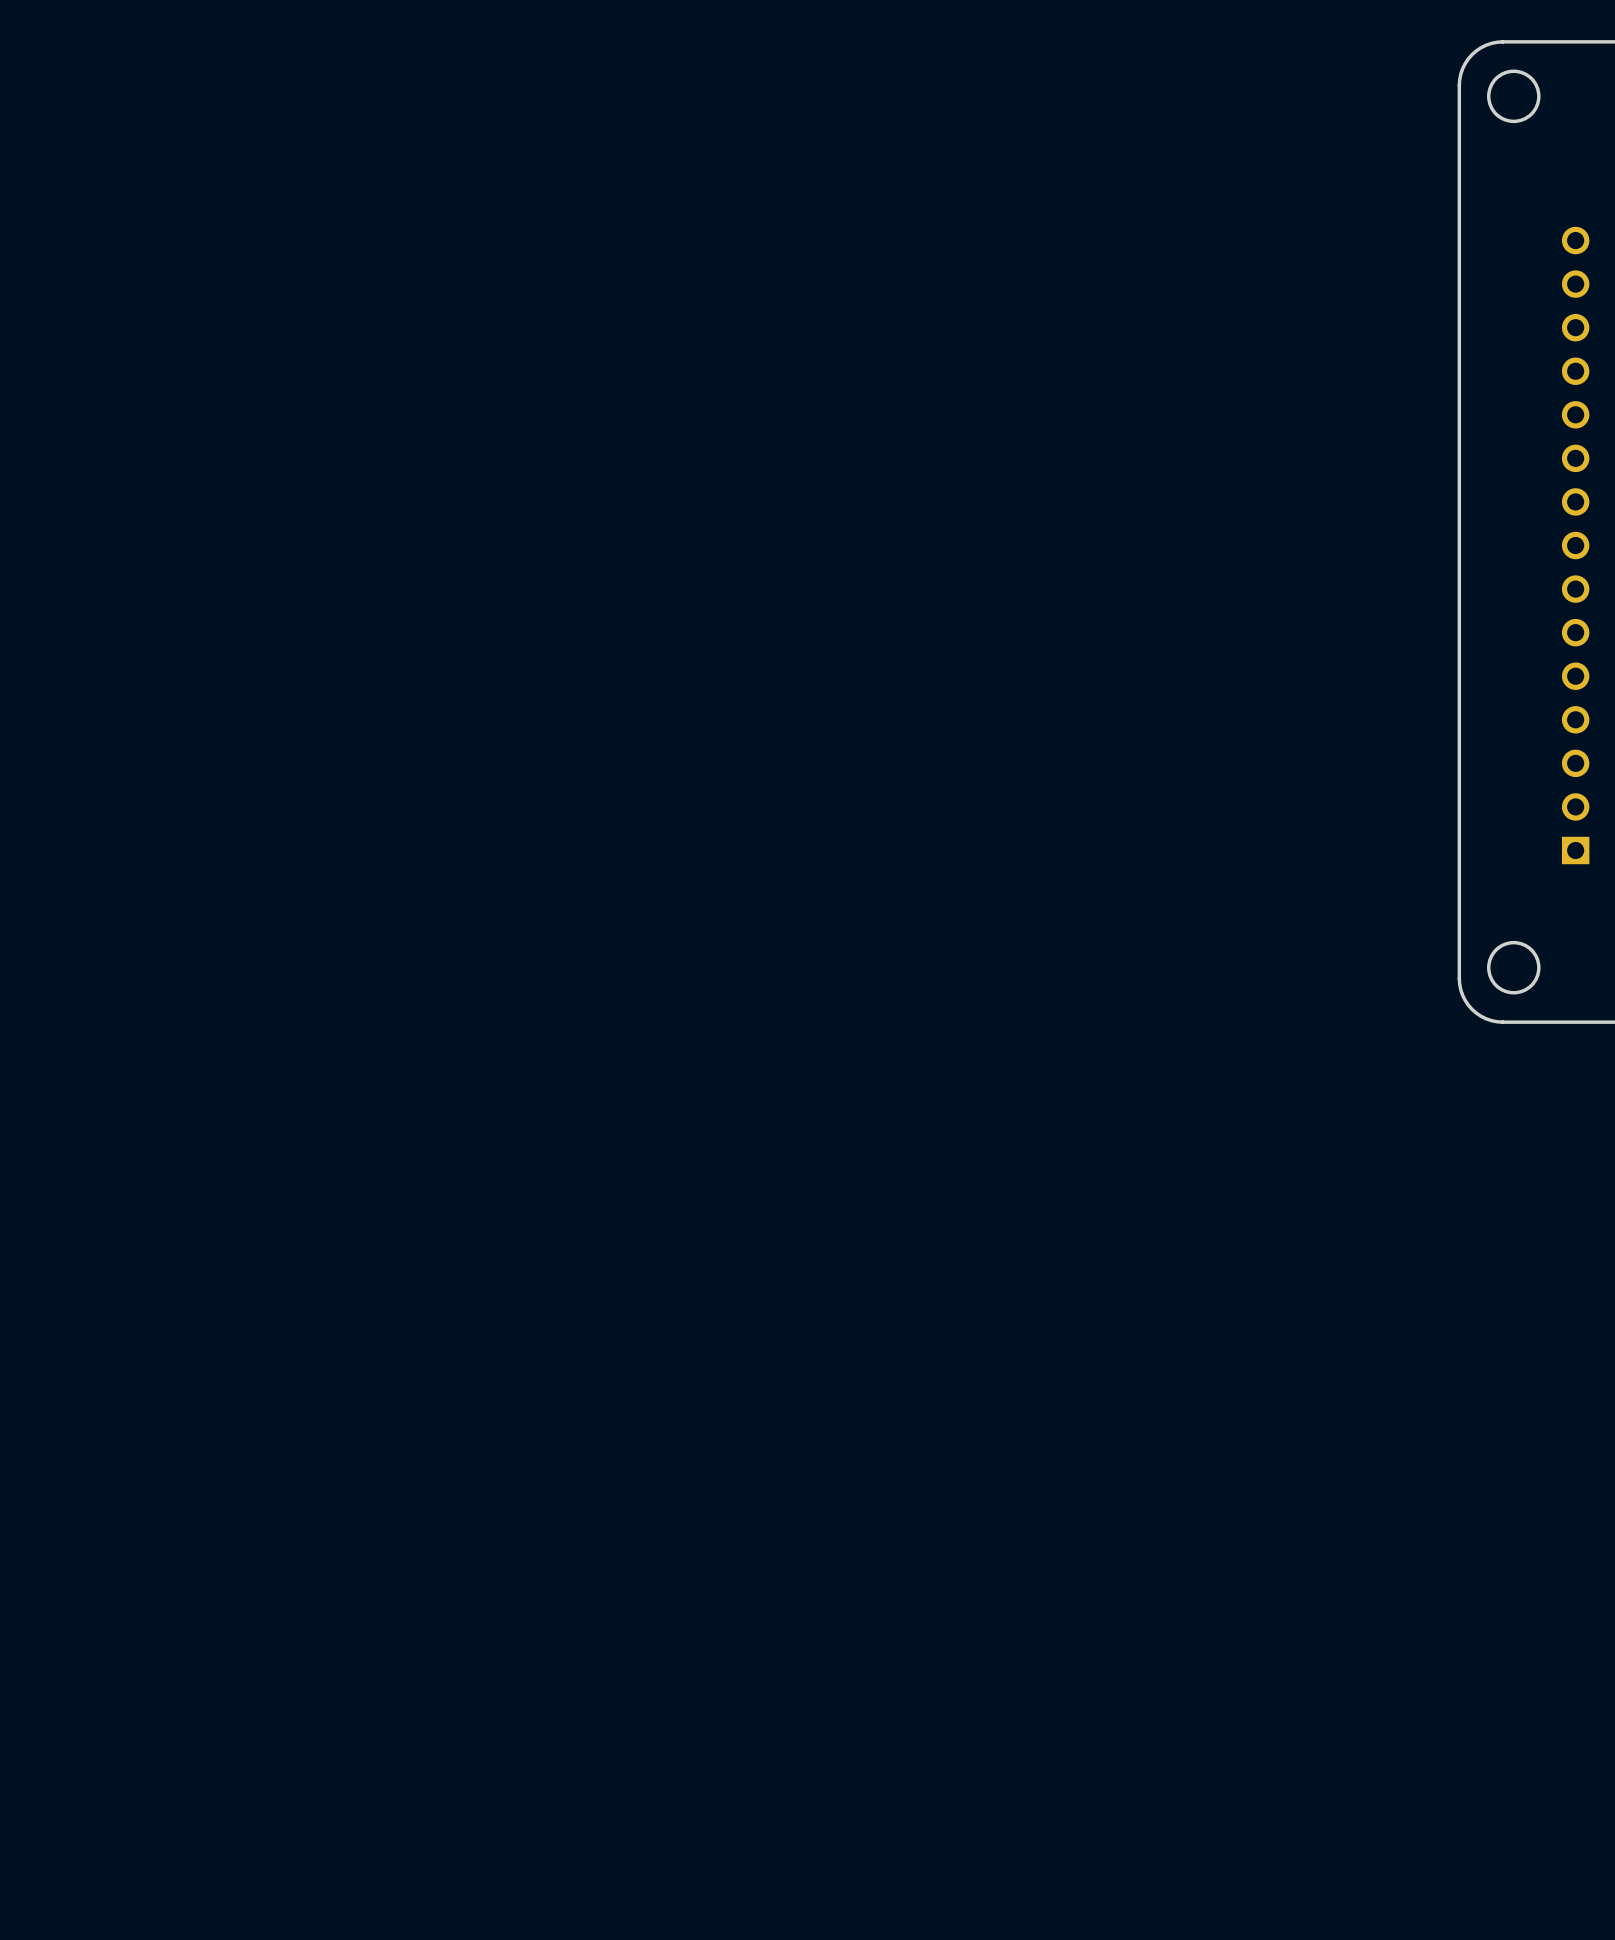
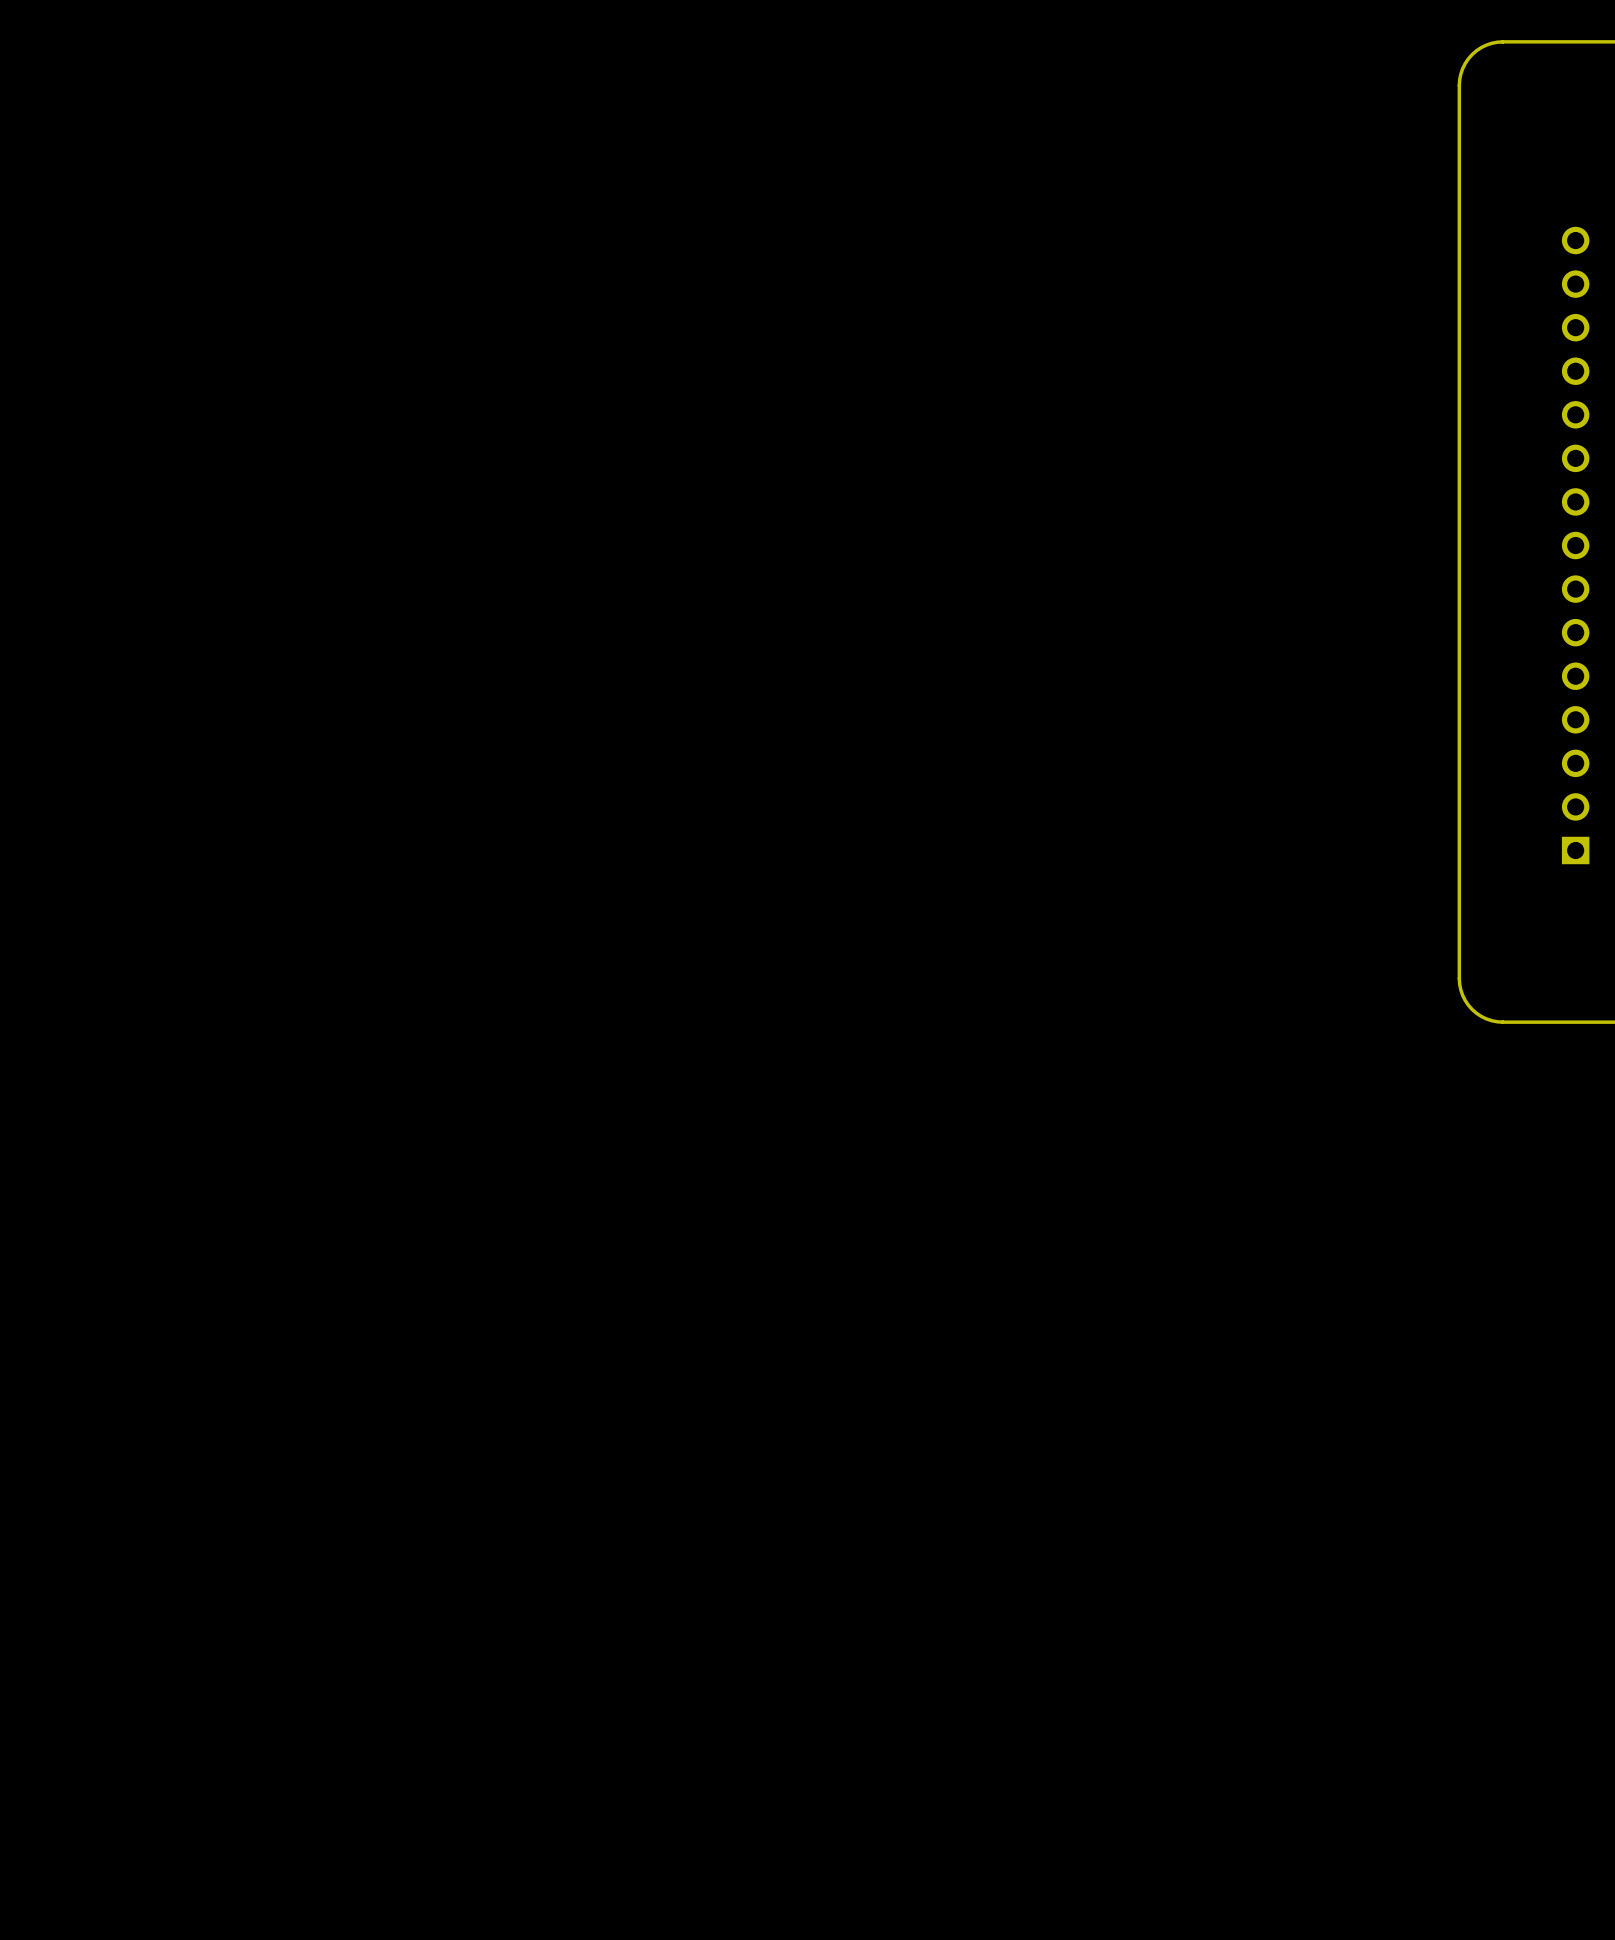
round board edge: [1487, 69, 1541, 124] -> none
round board edge: [1487, 940, 1541, 995] -> none

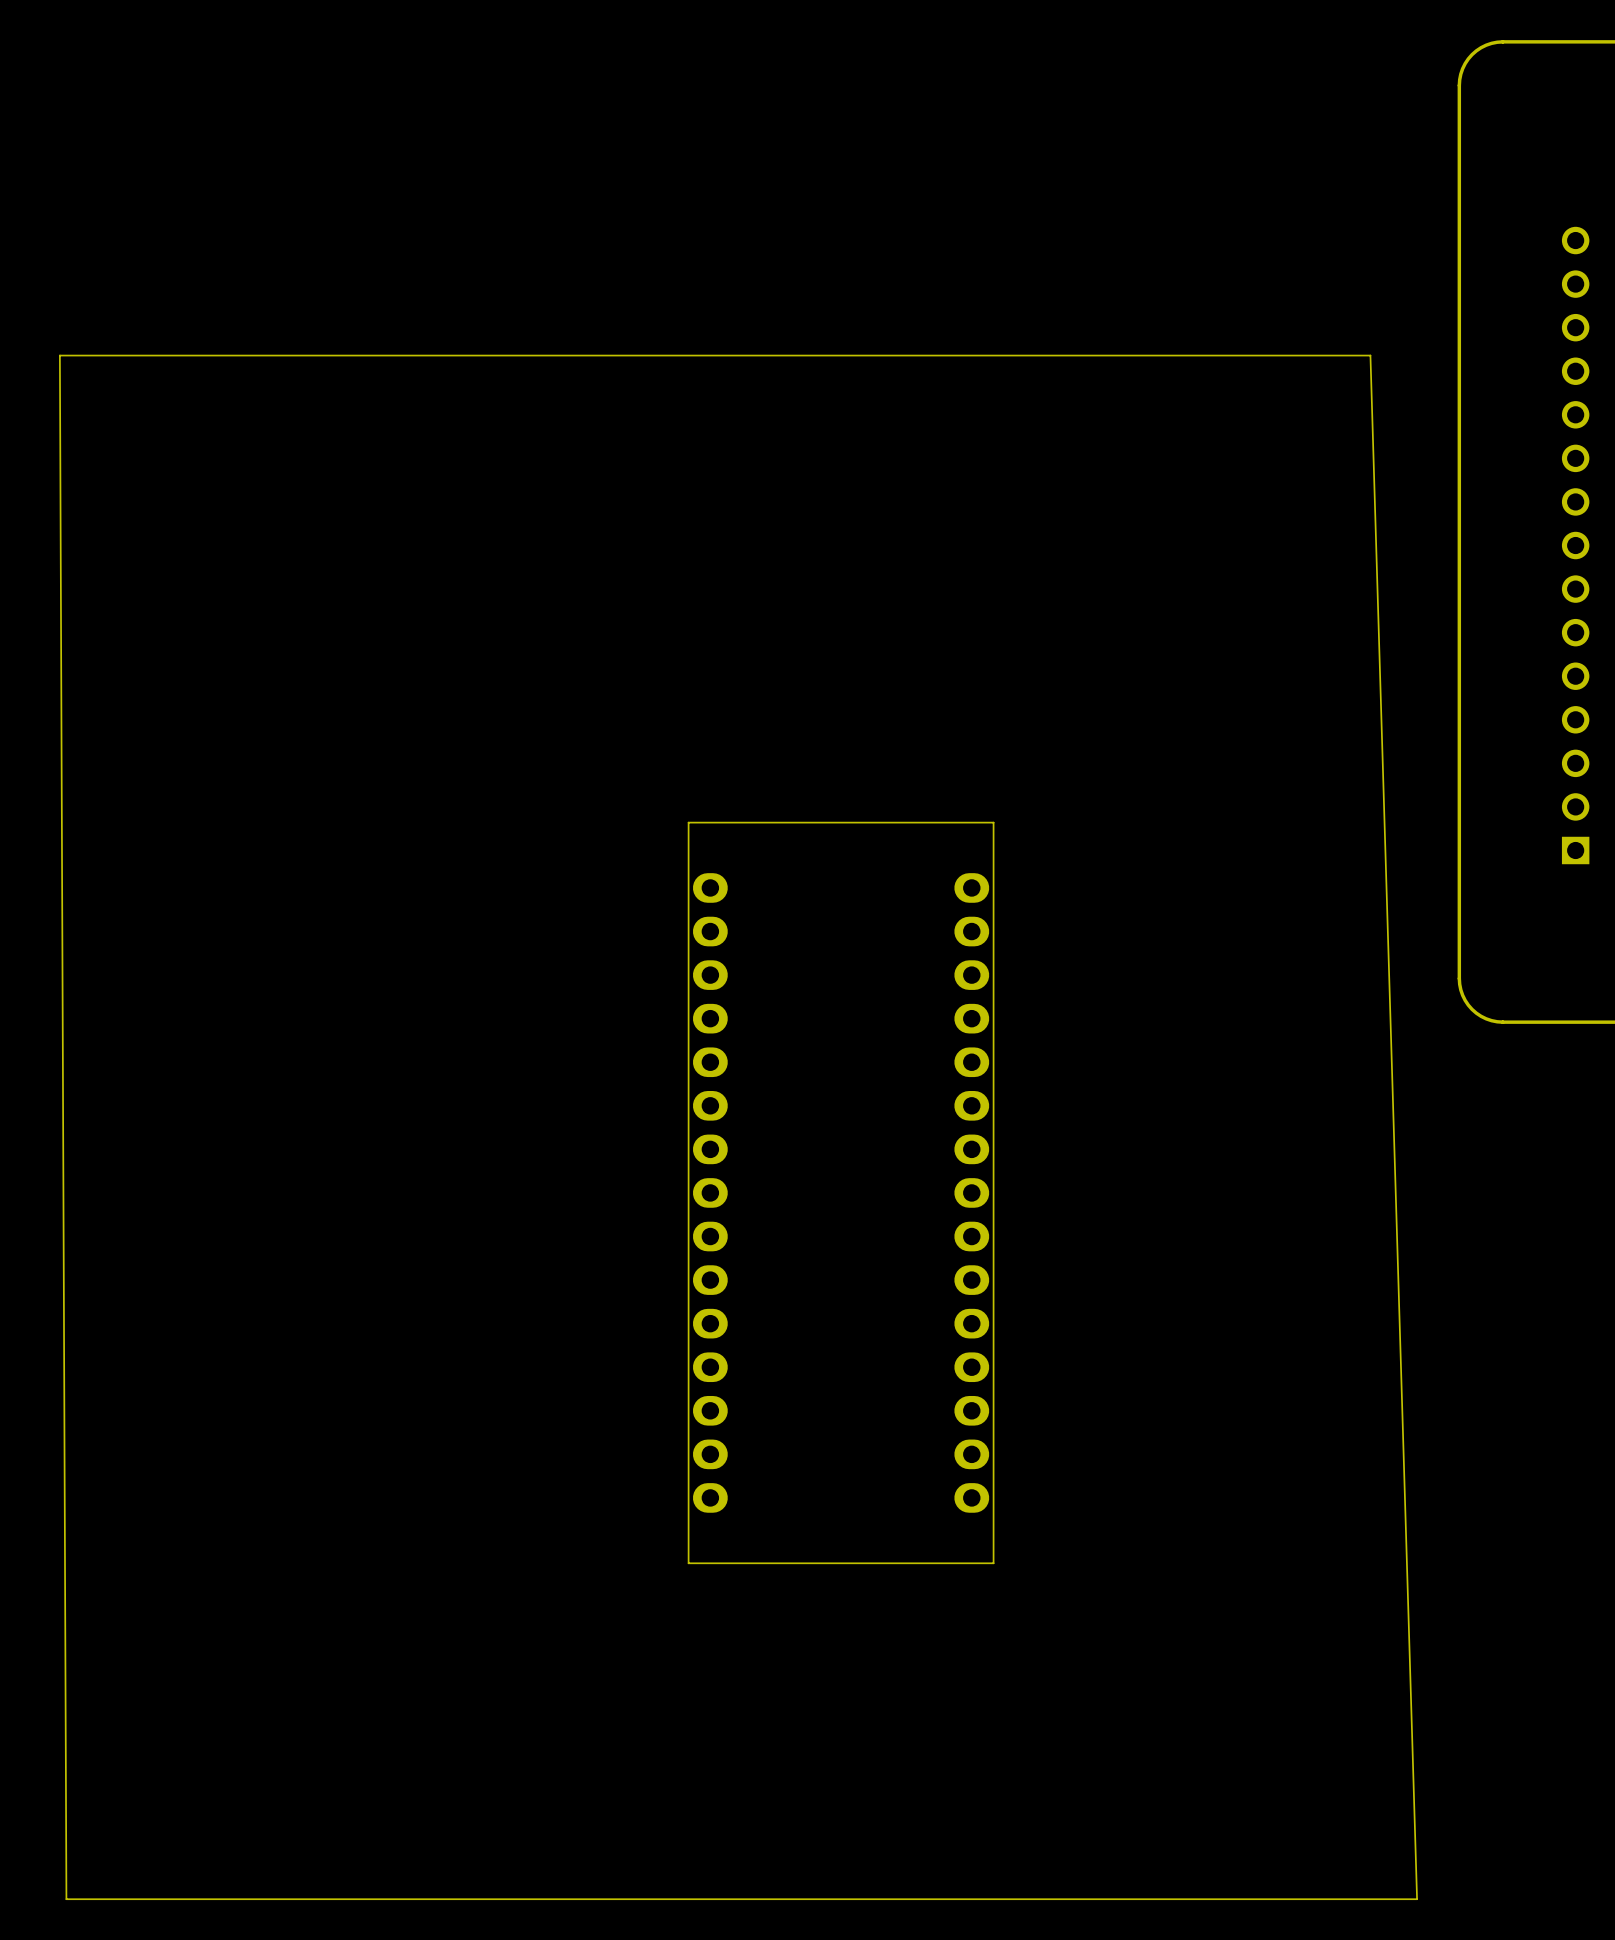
board edge: none -> (1370, 355) (1417, 1899) (66, 1899) (59, 355) (1370, 355)
board edge: none -> (993, 822) (993, 1563) (688, 1563) (688, 822) (993, 822)
part: none -> (710, 1192)
part: none -> (971, 1192)

